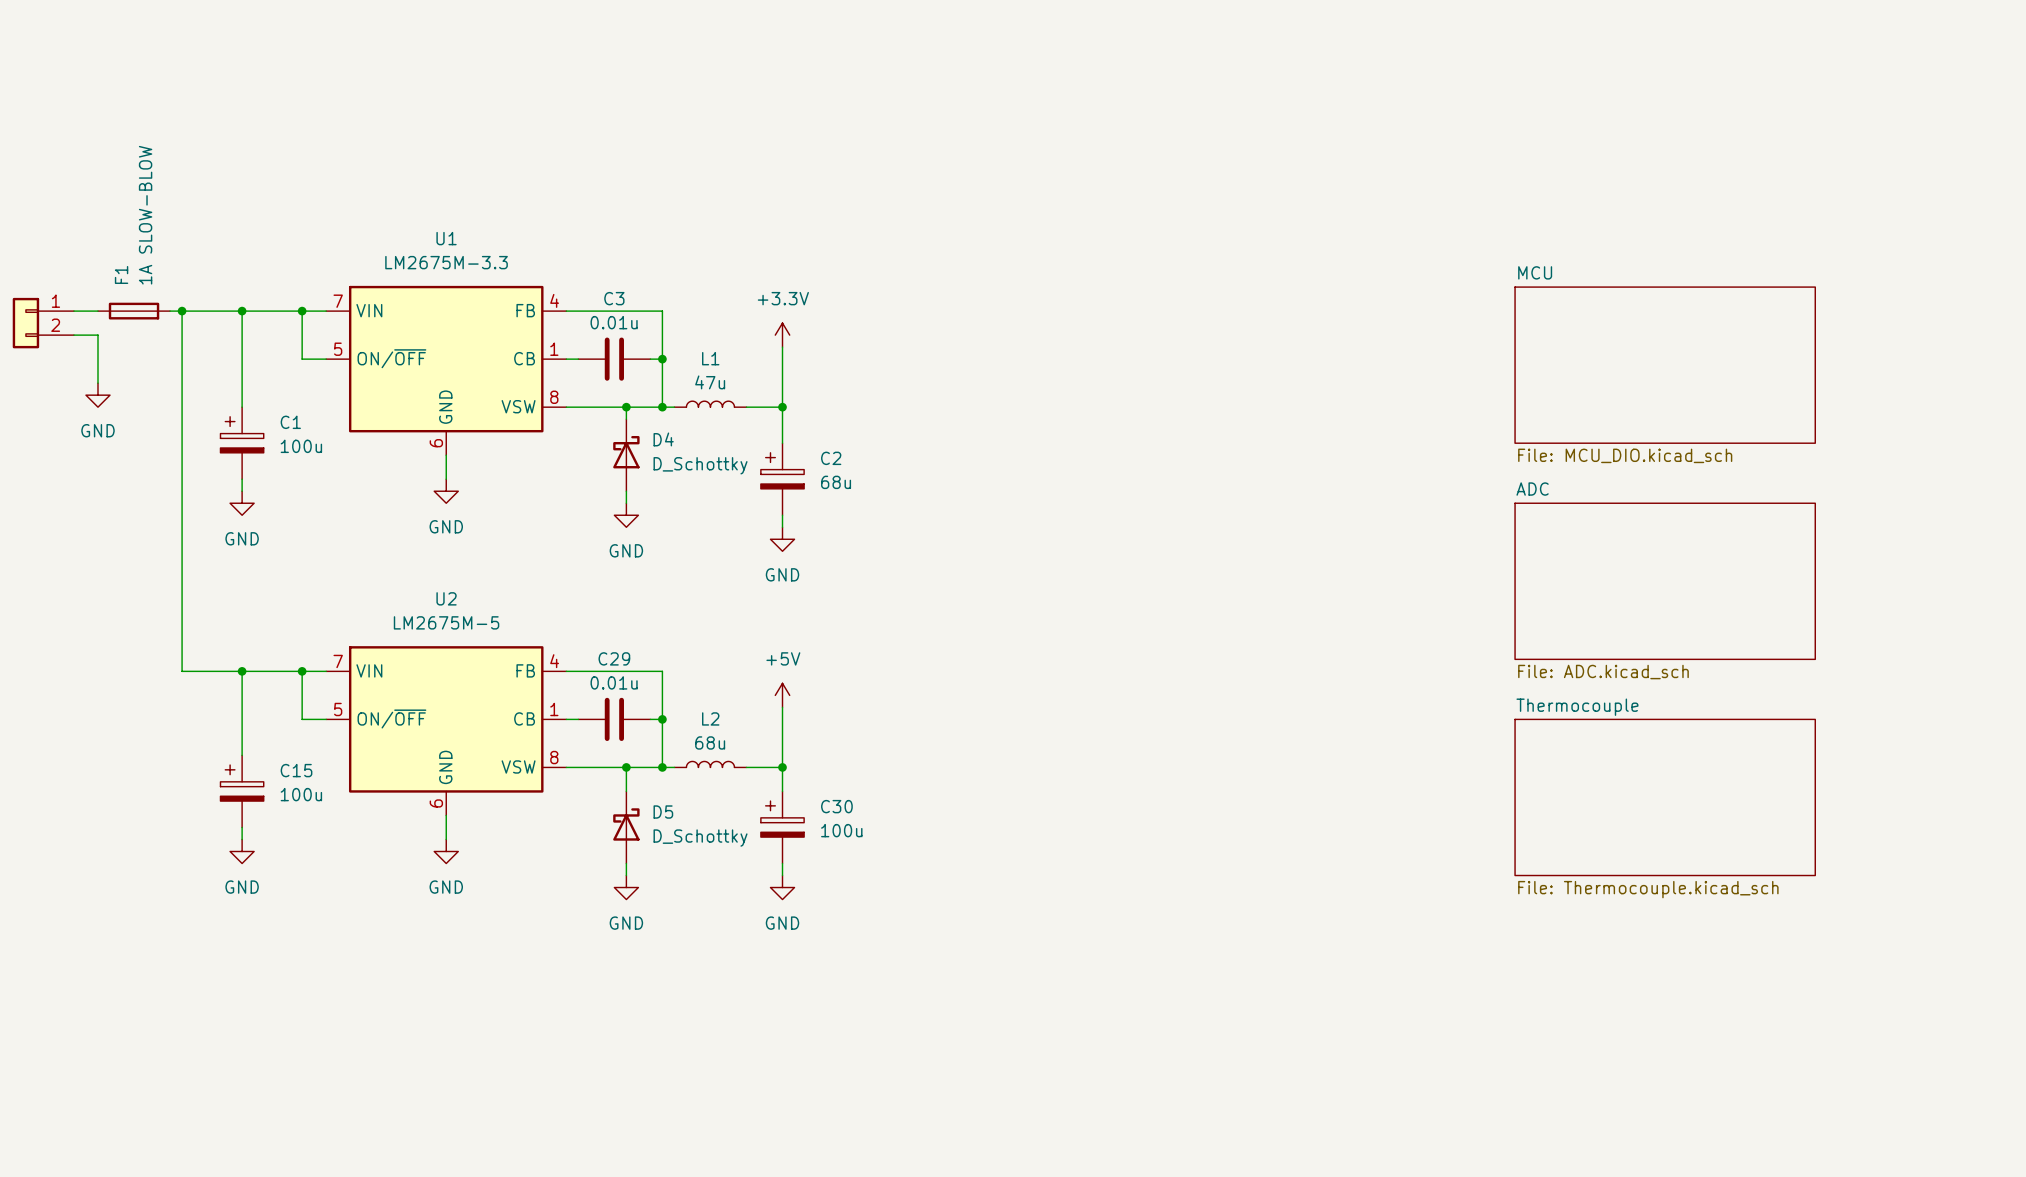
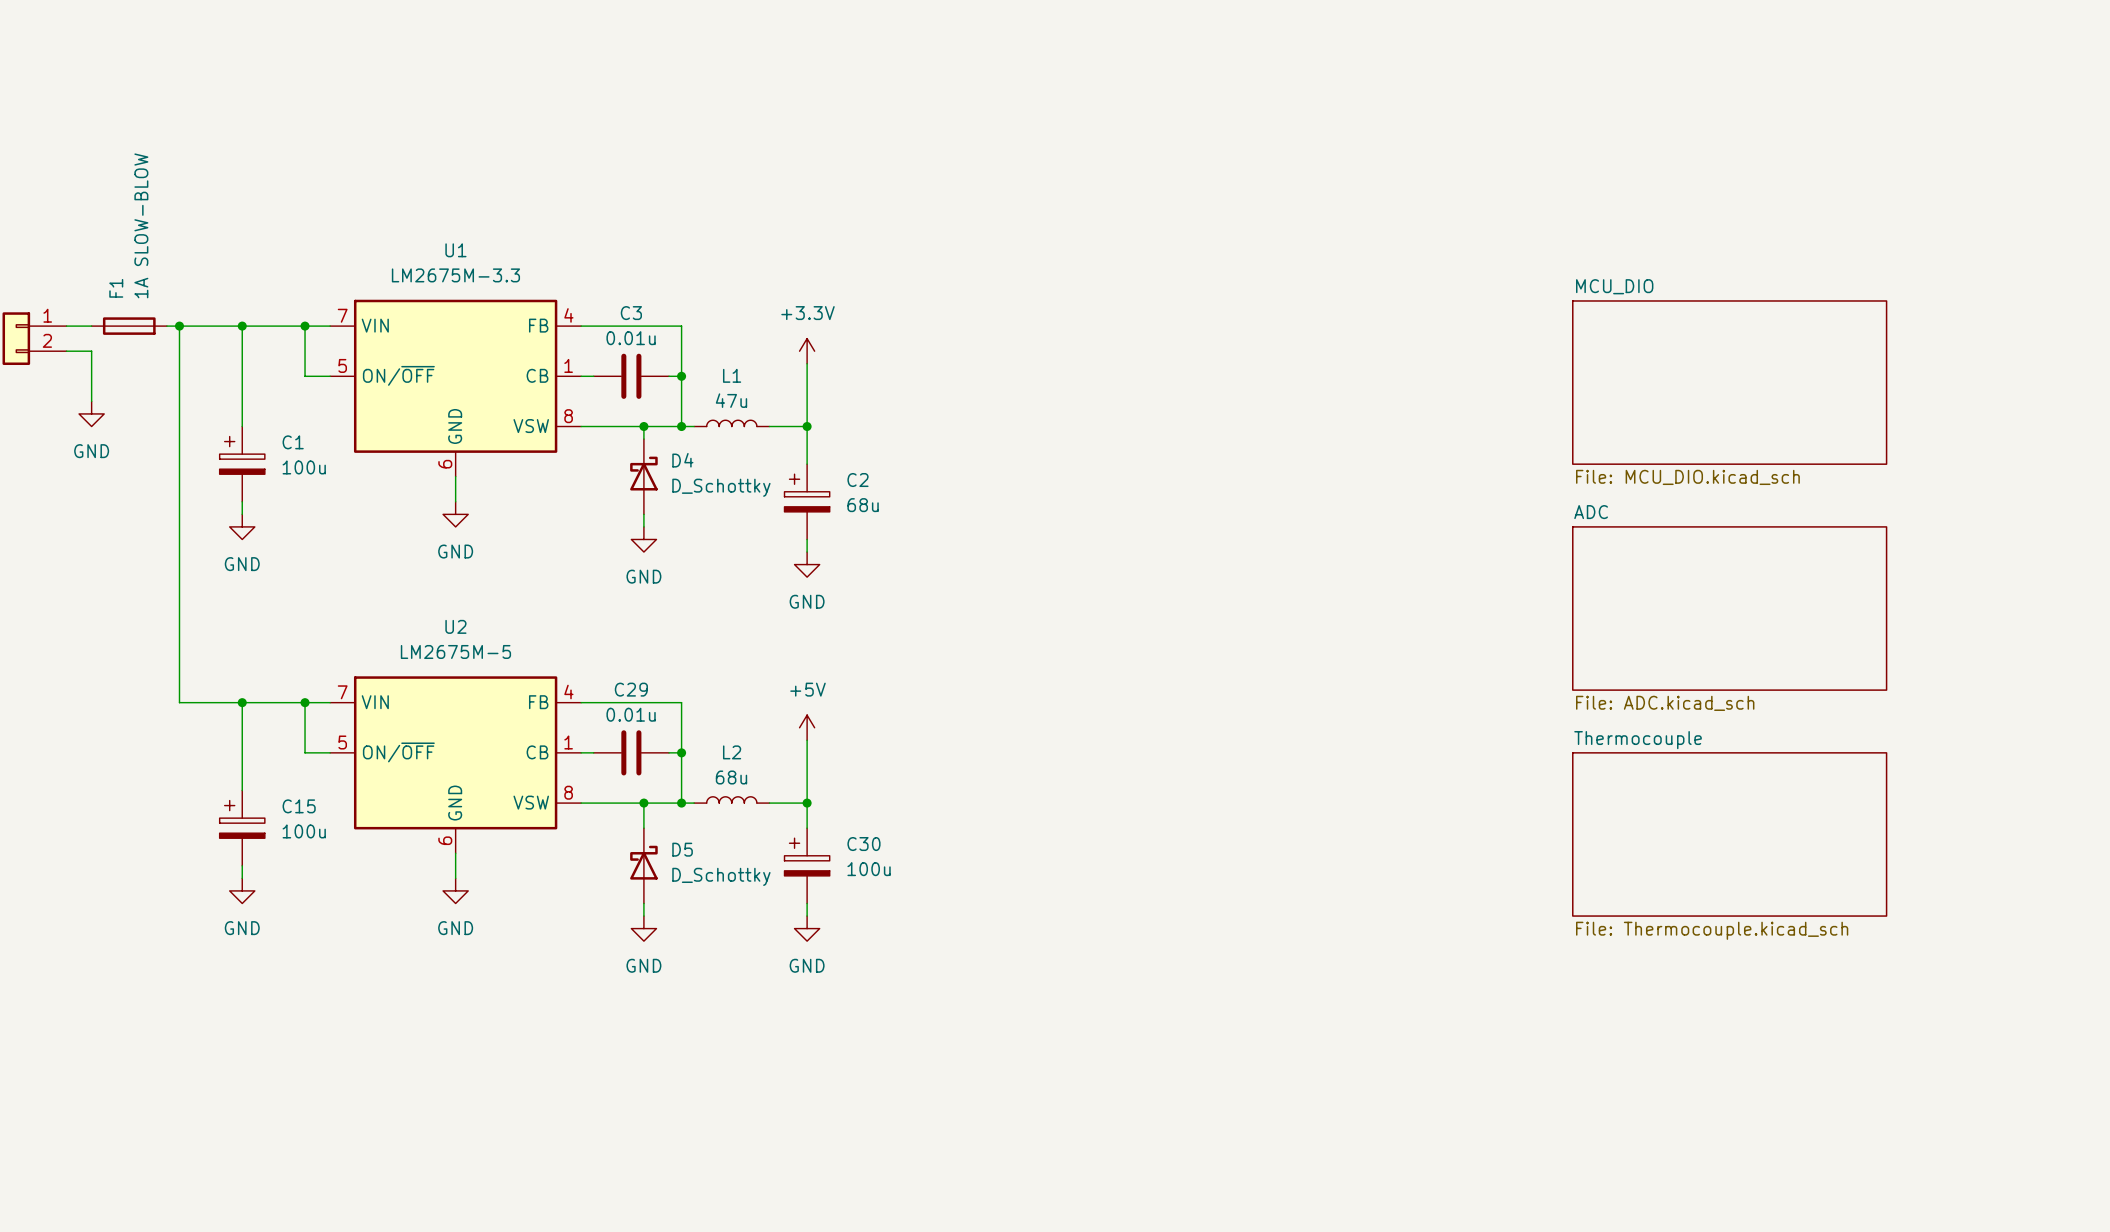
sheet MCU name: MCU (1535, 272) -> MCU_DIO (1614, 286)

